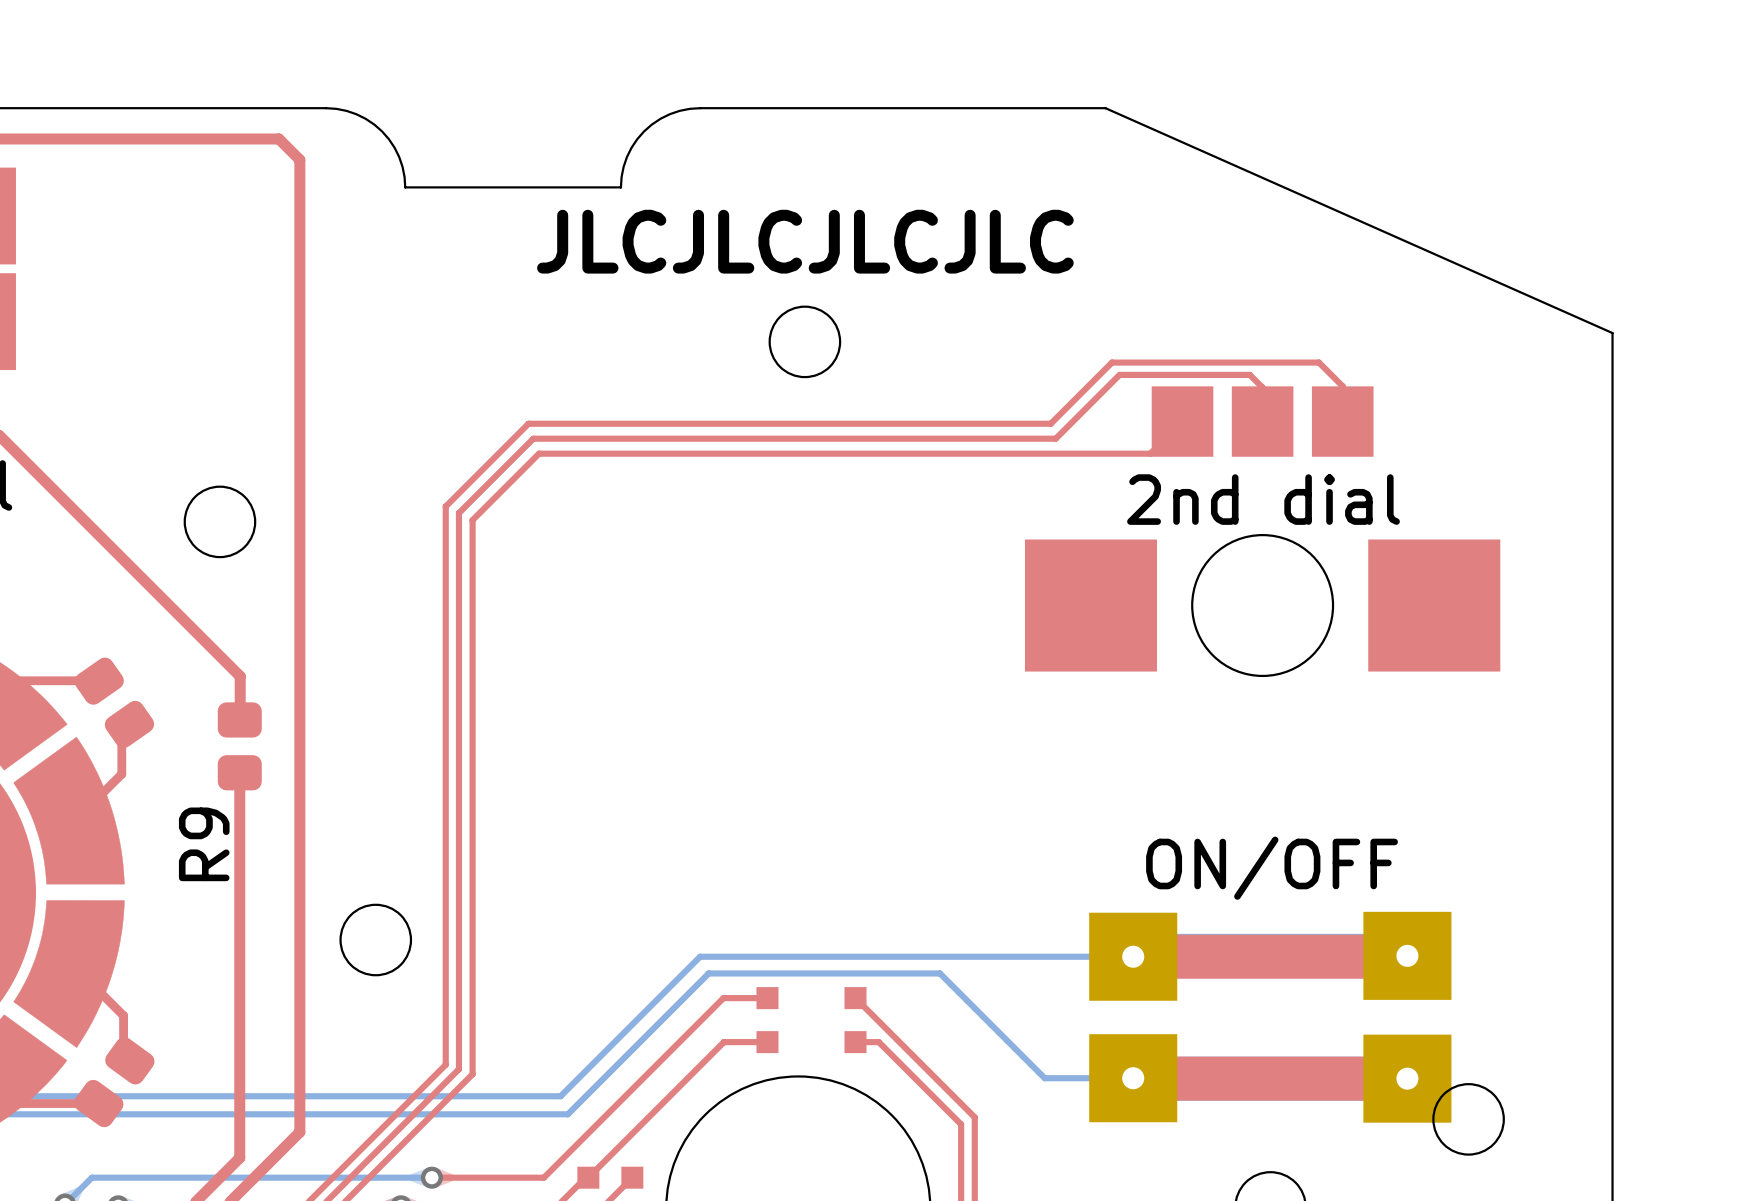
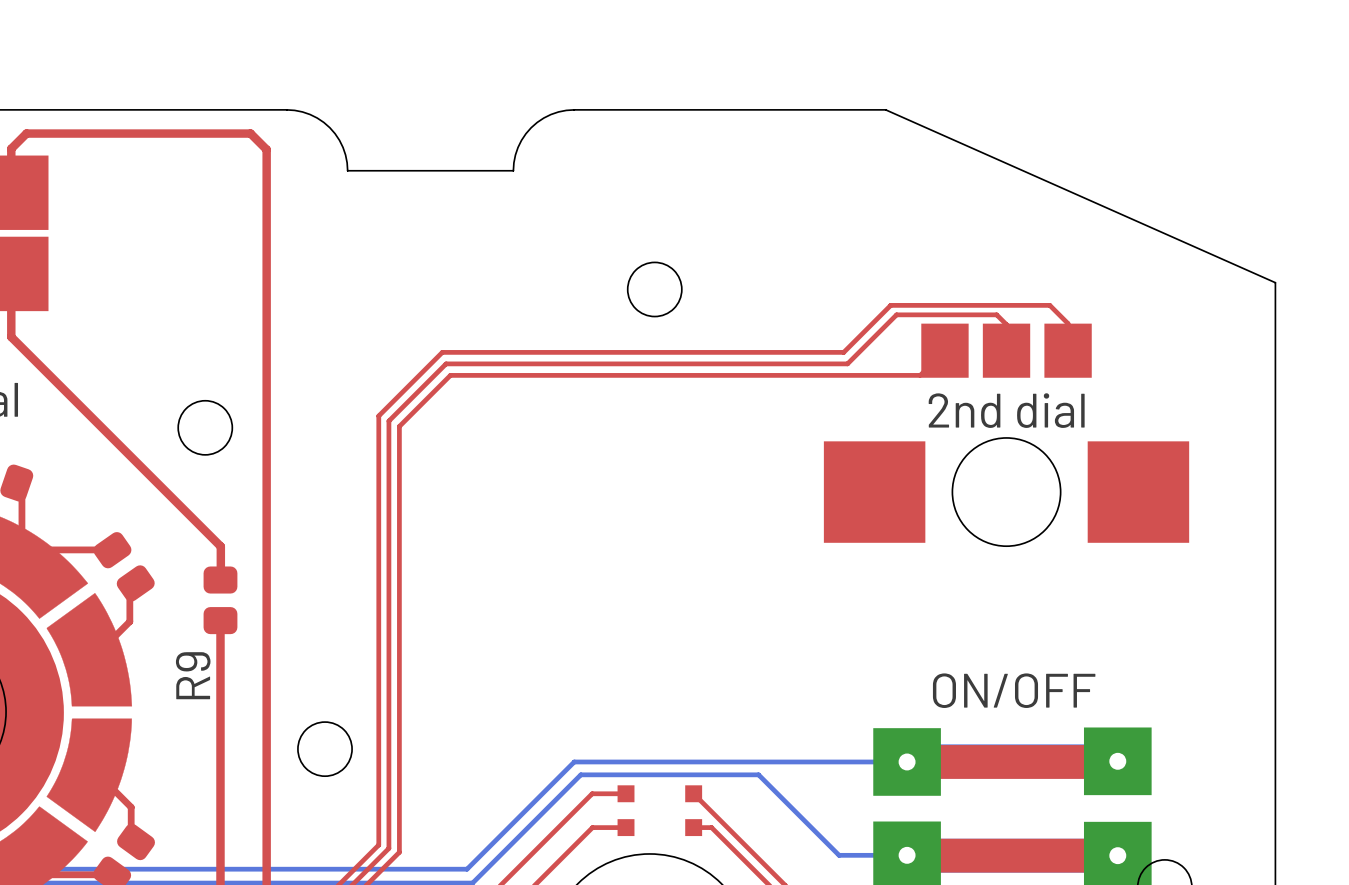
text: JLCJLCJLCJLC (805, 241) -> none

